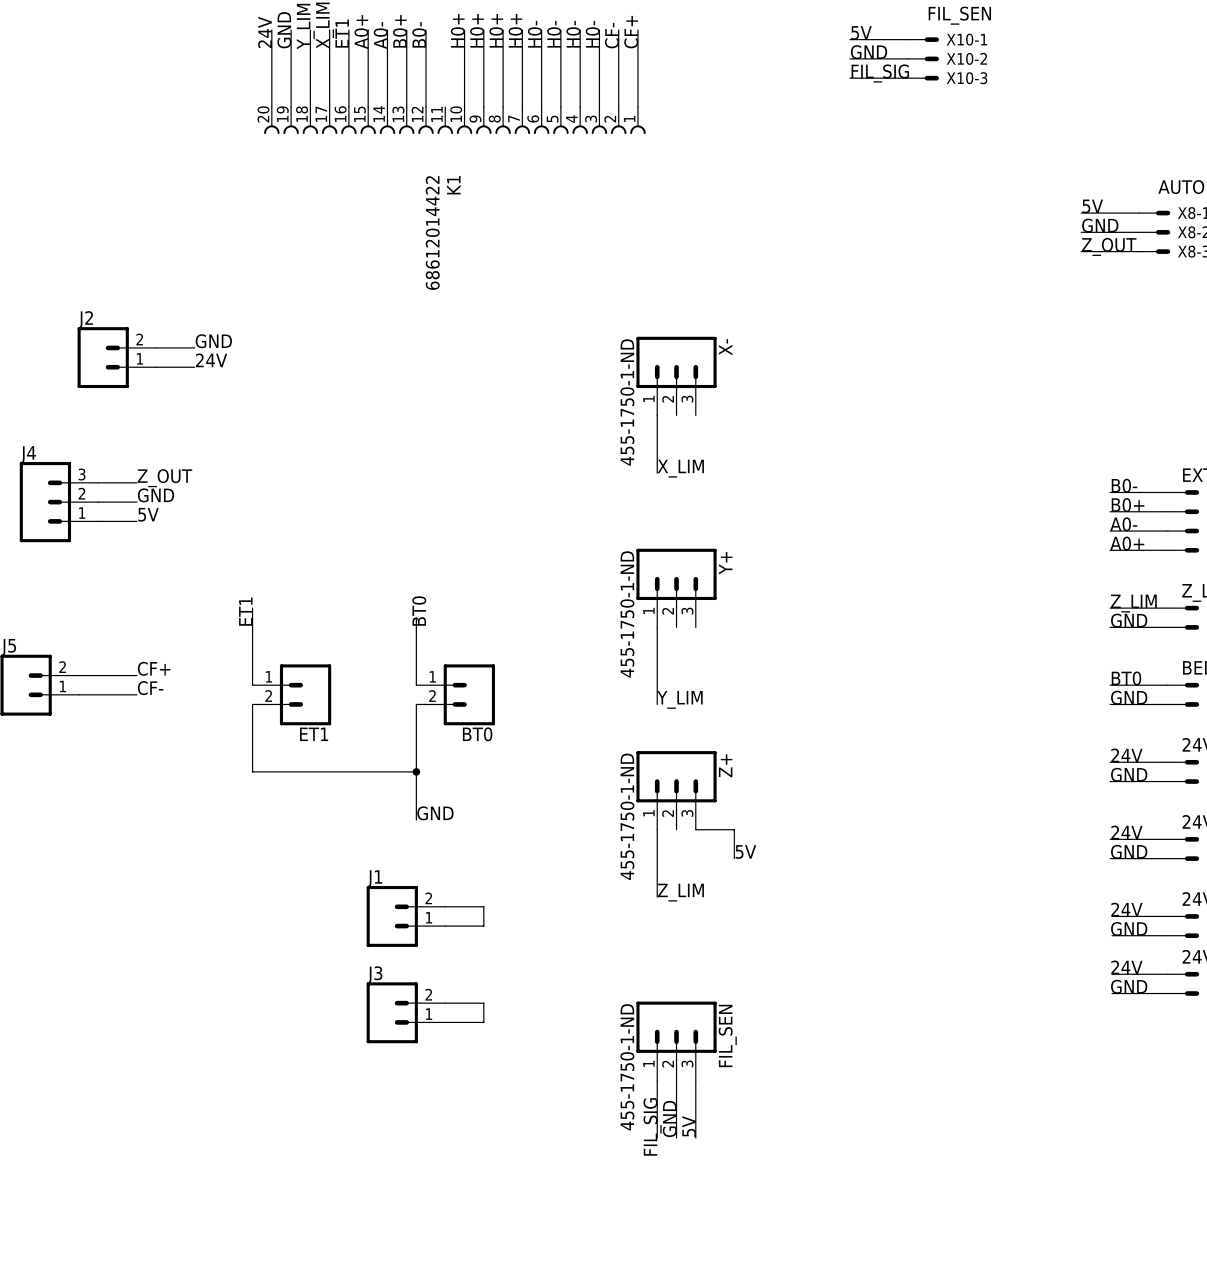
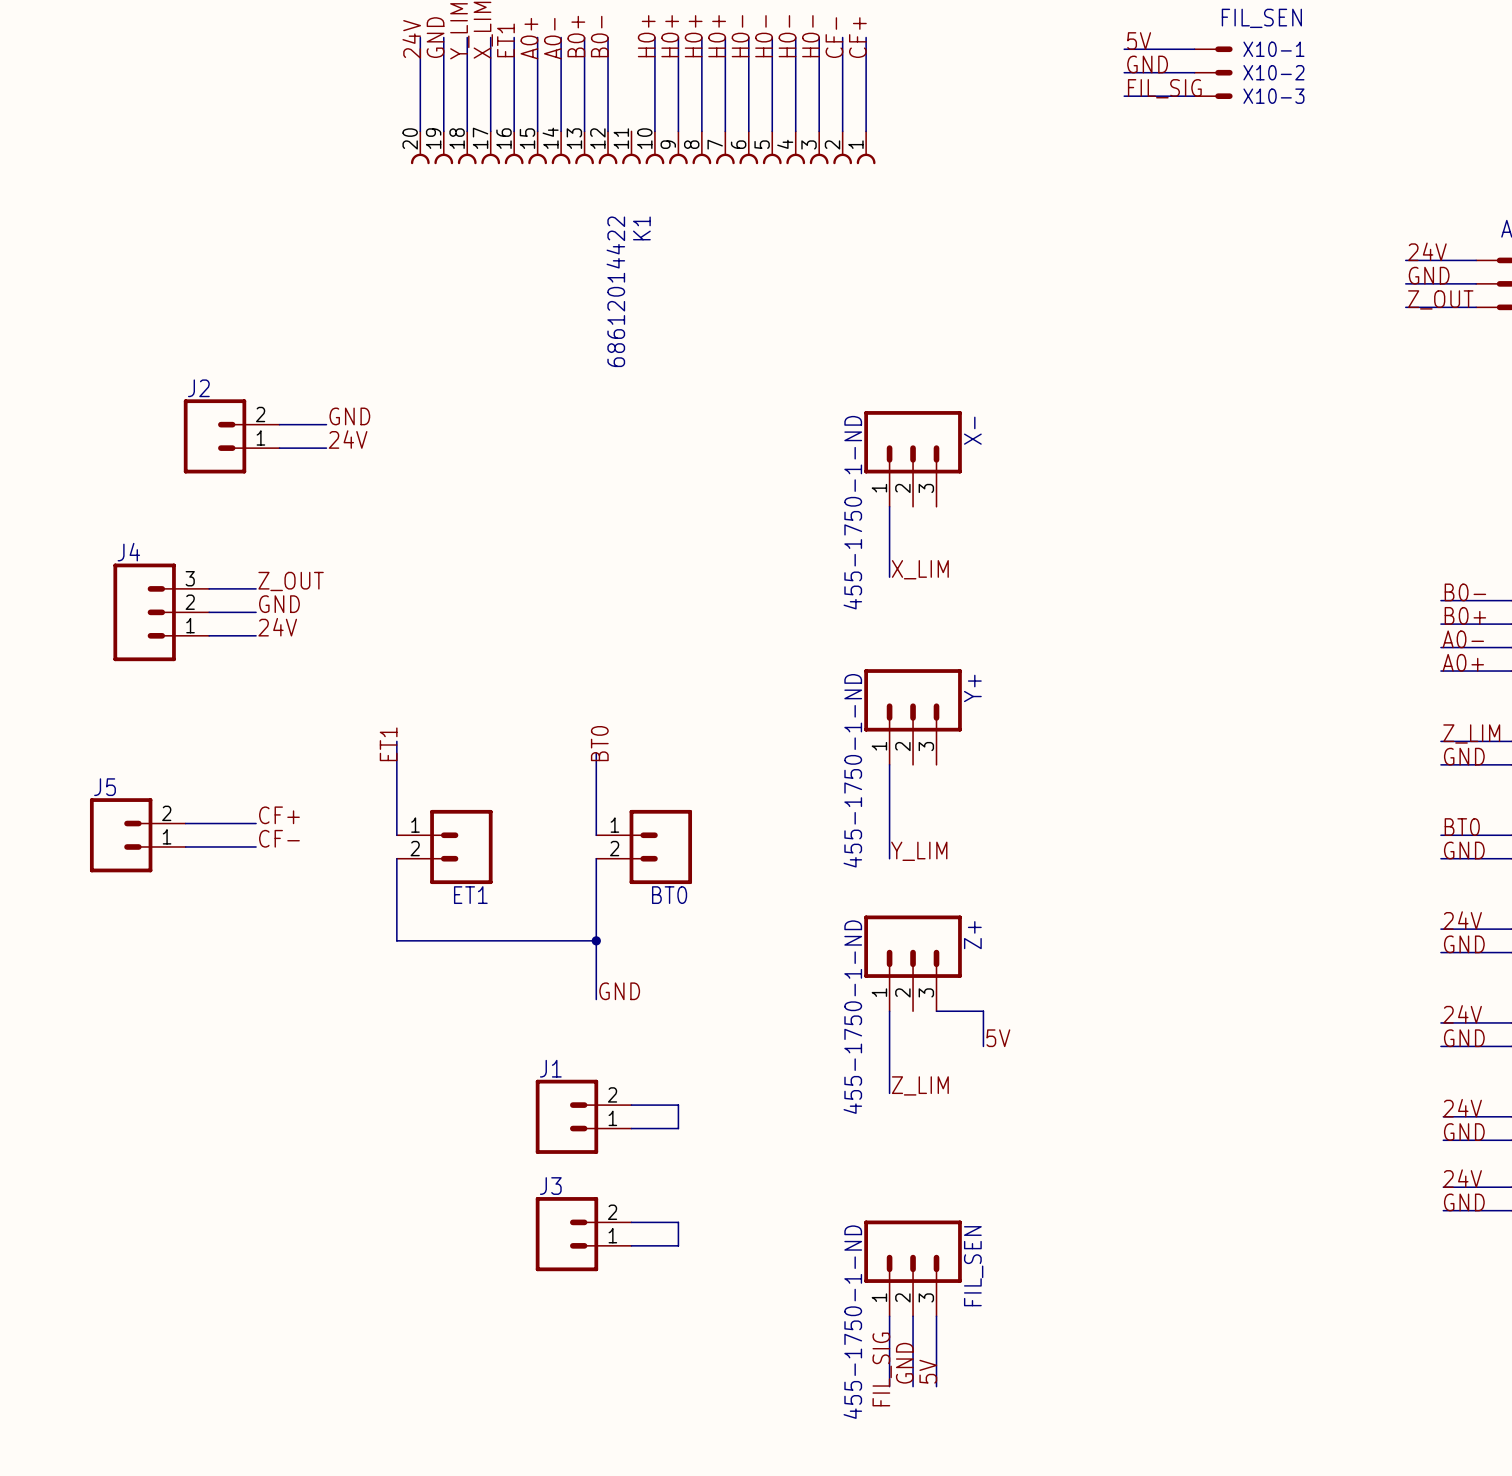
label: 5V (1092, 206) -> 24V (1427, 251)
label: 5V (148, 514) -> 24V (277, 627)

